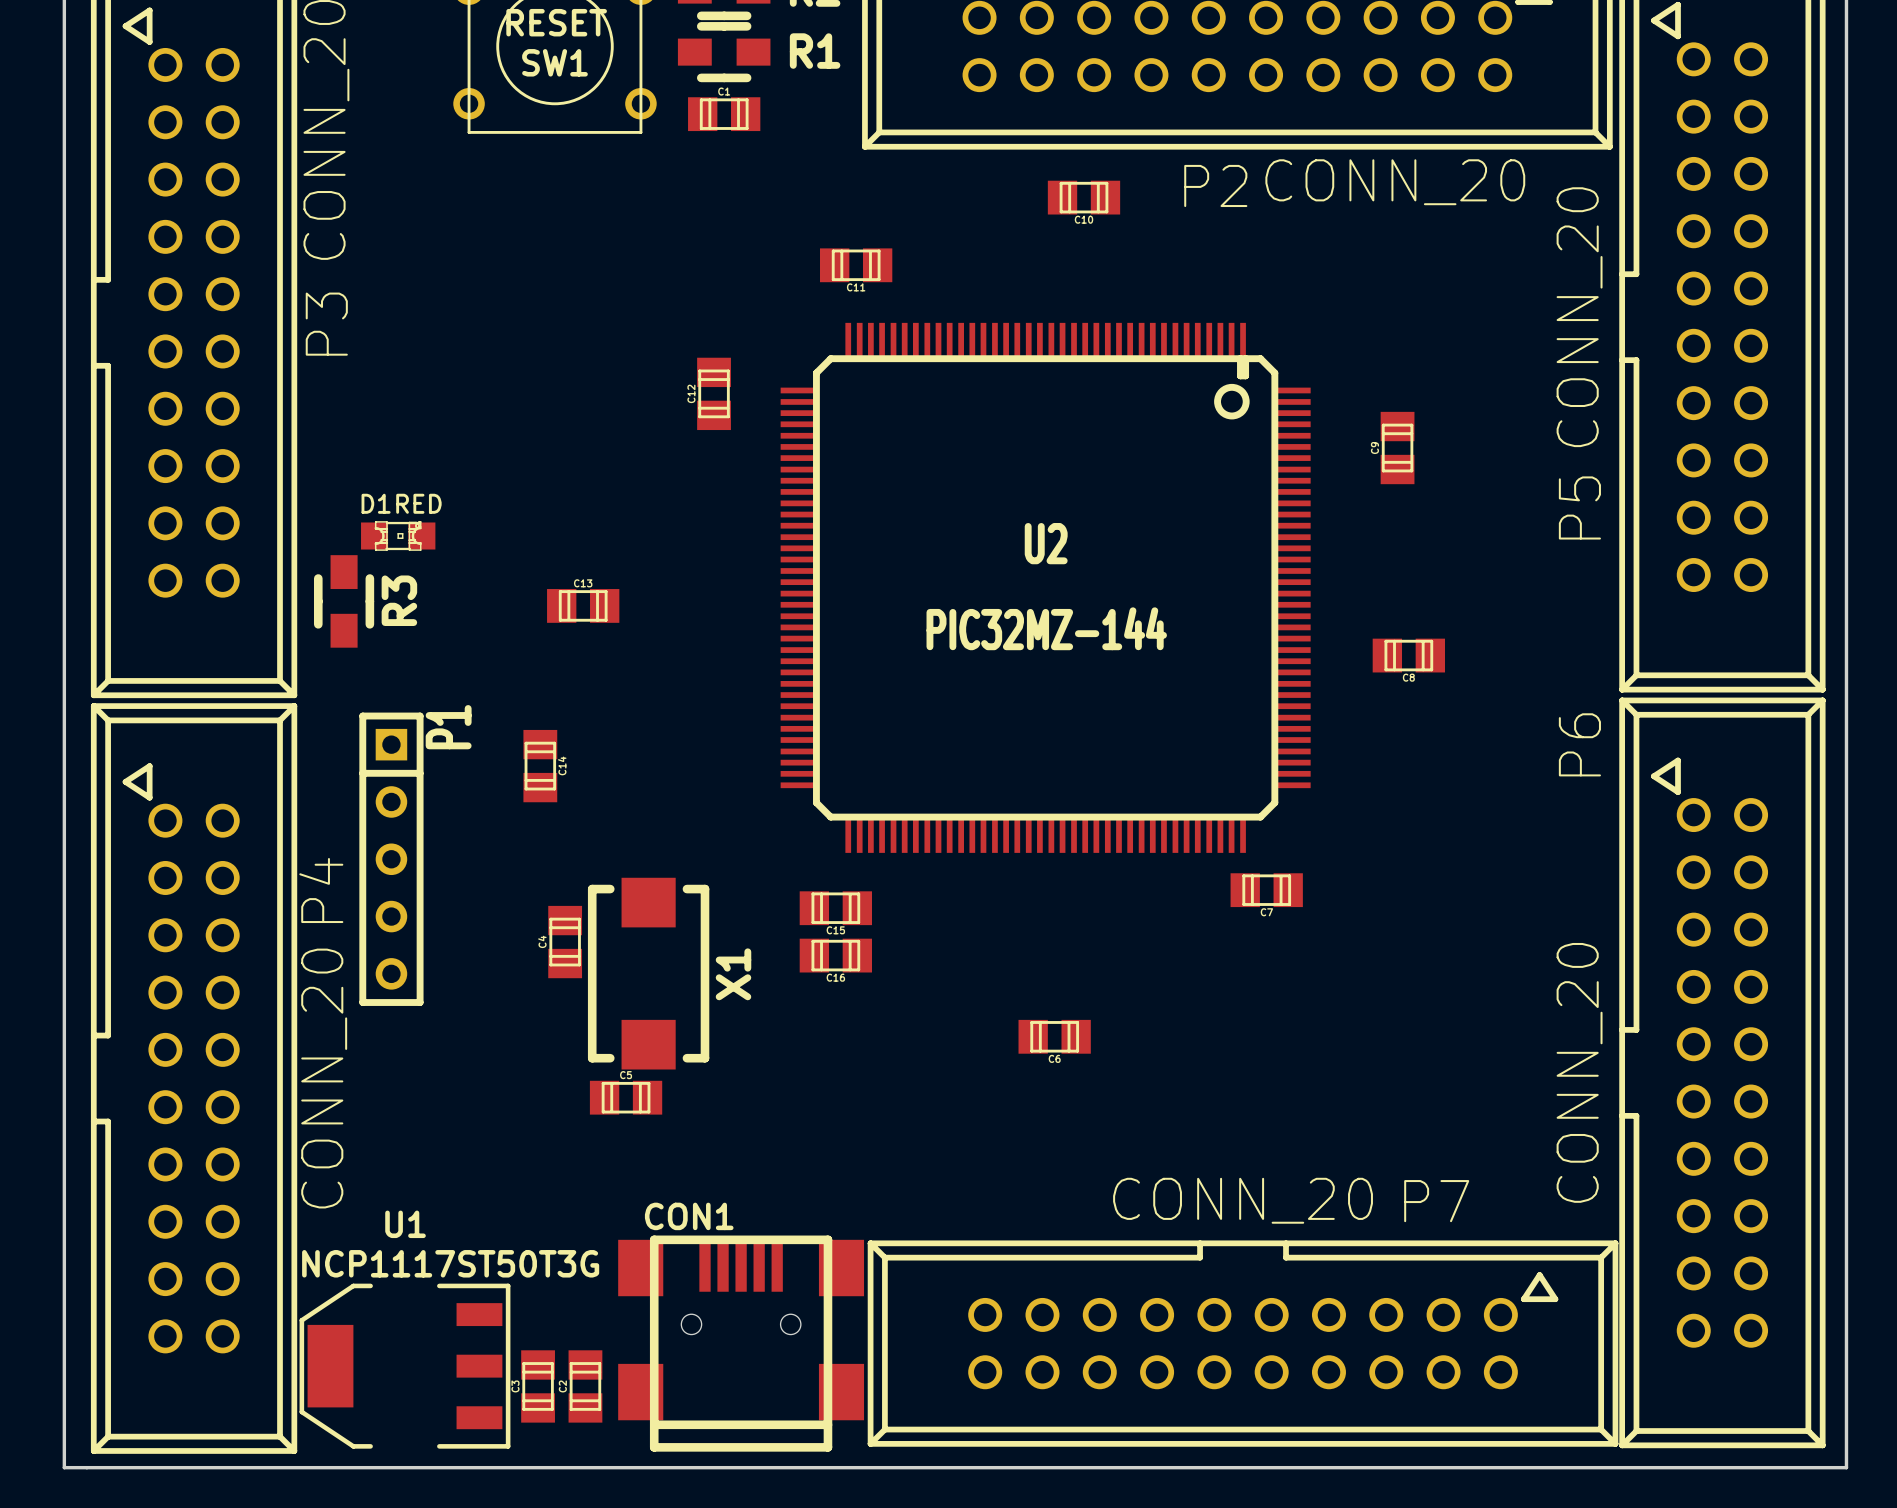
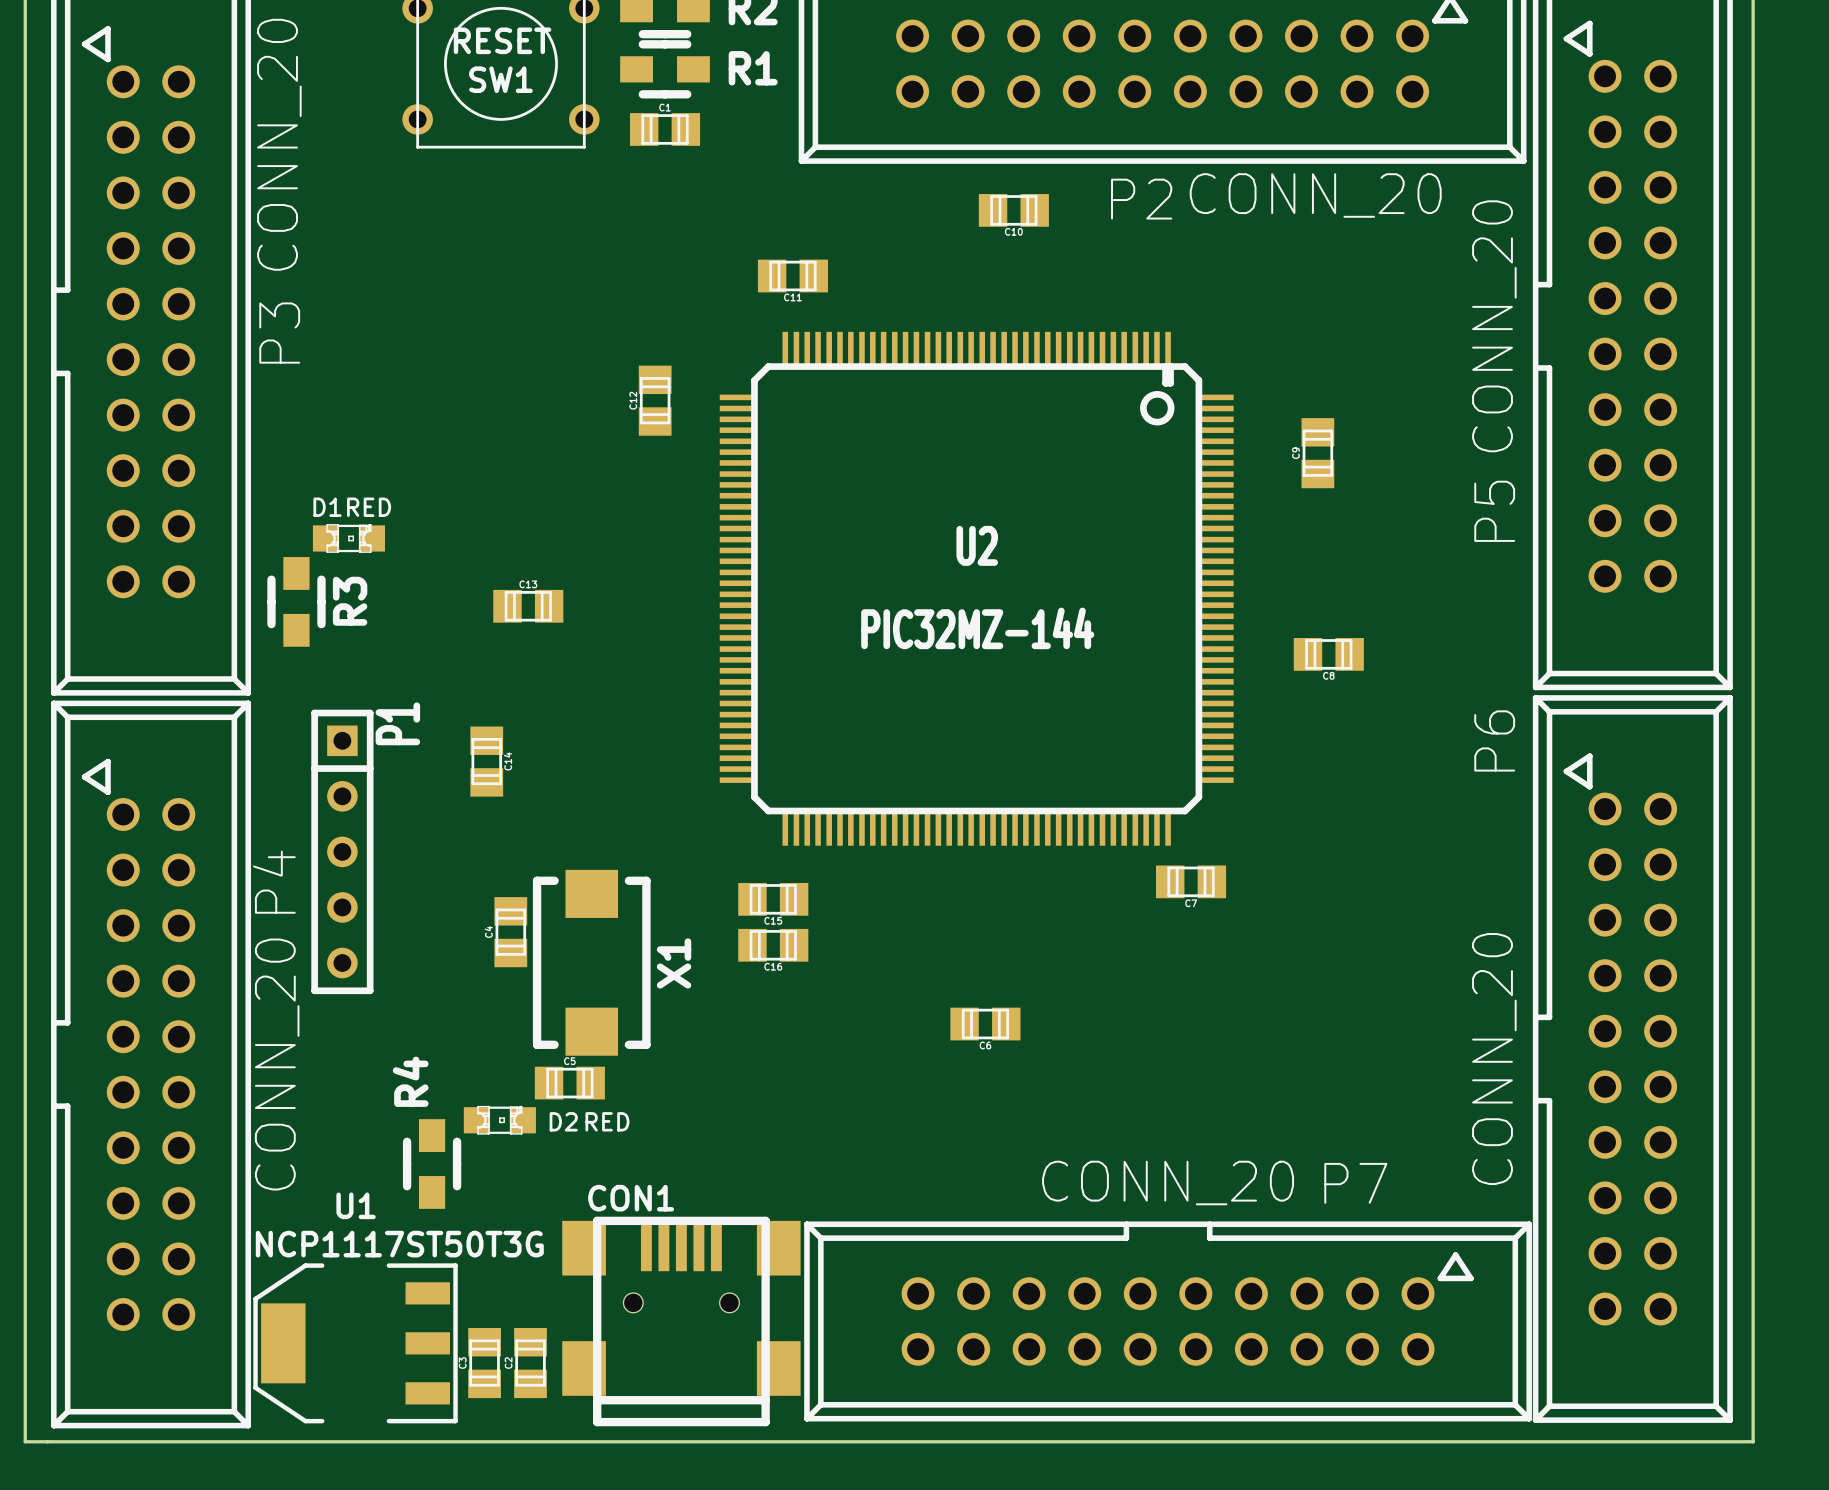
D2: none -> RED (499, 1120)
R4: none -> (432, 1164)

